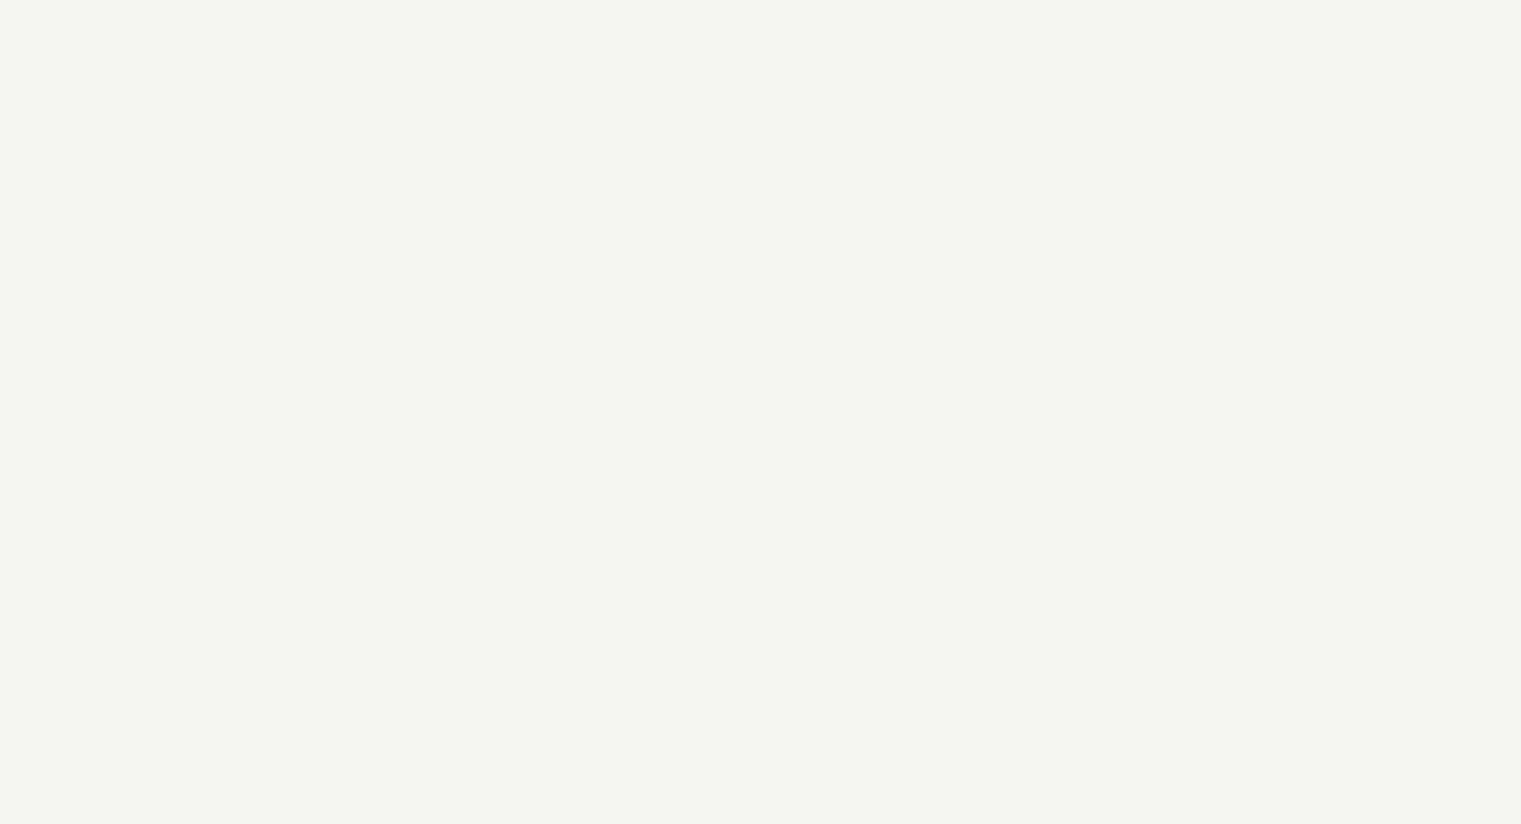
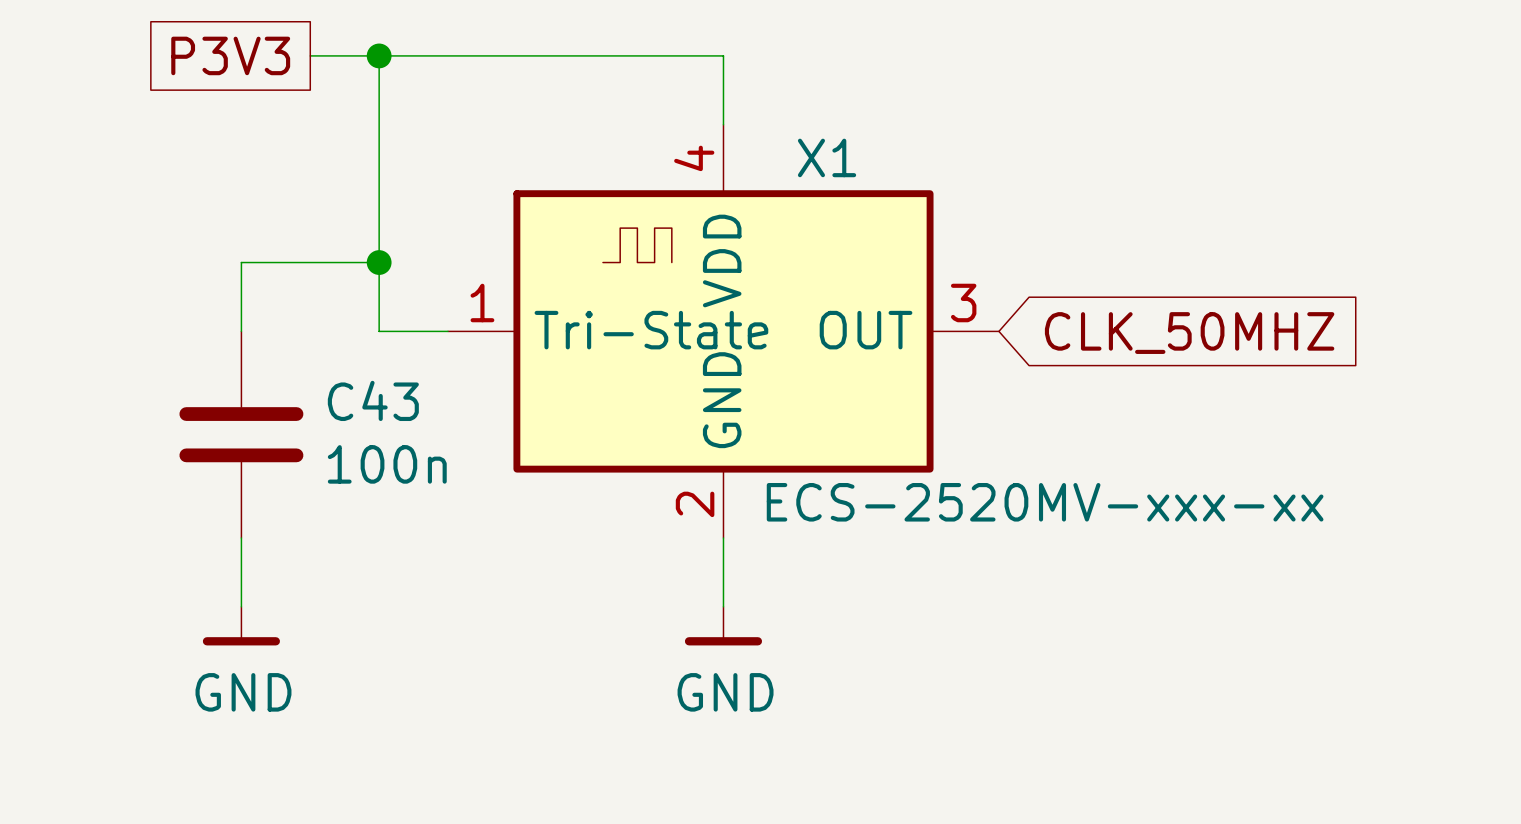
global label: none -> P3V3 (230, 55)
wire: none -> (310, 55) (723, 55) (723, 124)
wire: none -> (379, 55) (379, 331) (448, 331)
junction: none -> (379, 55)
wire: none -> (379, 262) (241, 262) (241, 331)
junction: none -> (379, 262)
X1: none -> ECS-2520MV-xxx-xx (723, 331)
global label: none -> CLK_50MHZ (1189, 333)
C43: none -> 100n (241, 434)
wire: none -> (241, 538) (241, 606)
wire: none -> (723, 538) (723, 606)
power symbol: none -> GND (241, 626)
power symbol: none -> GND (723, 626)

